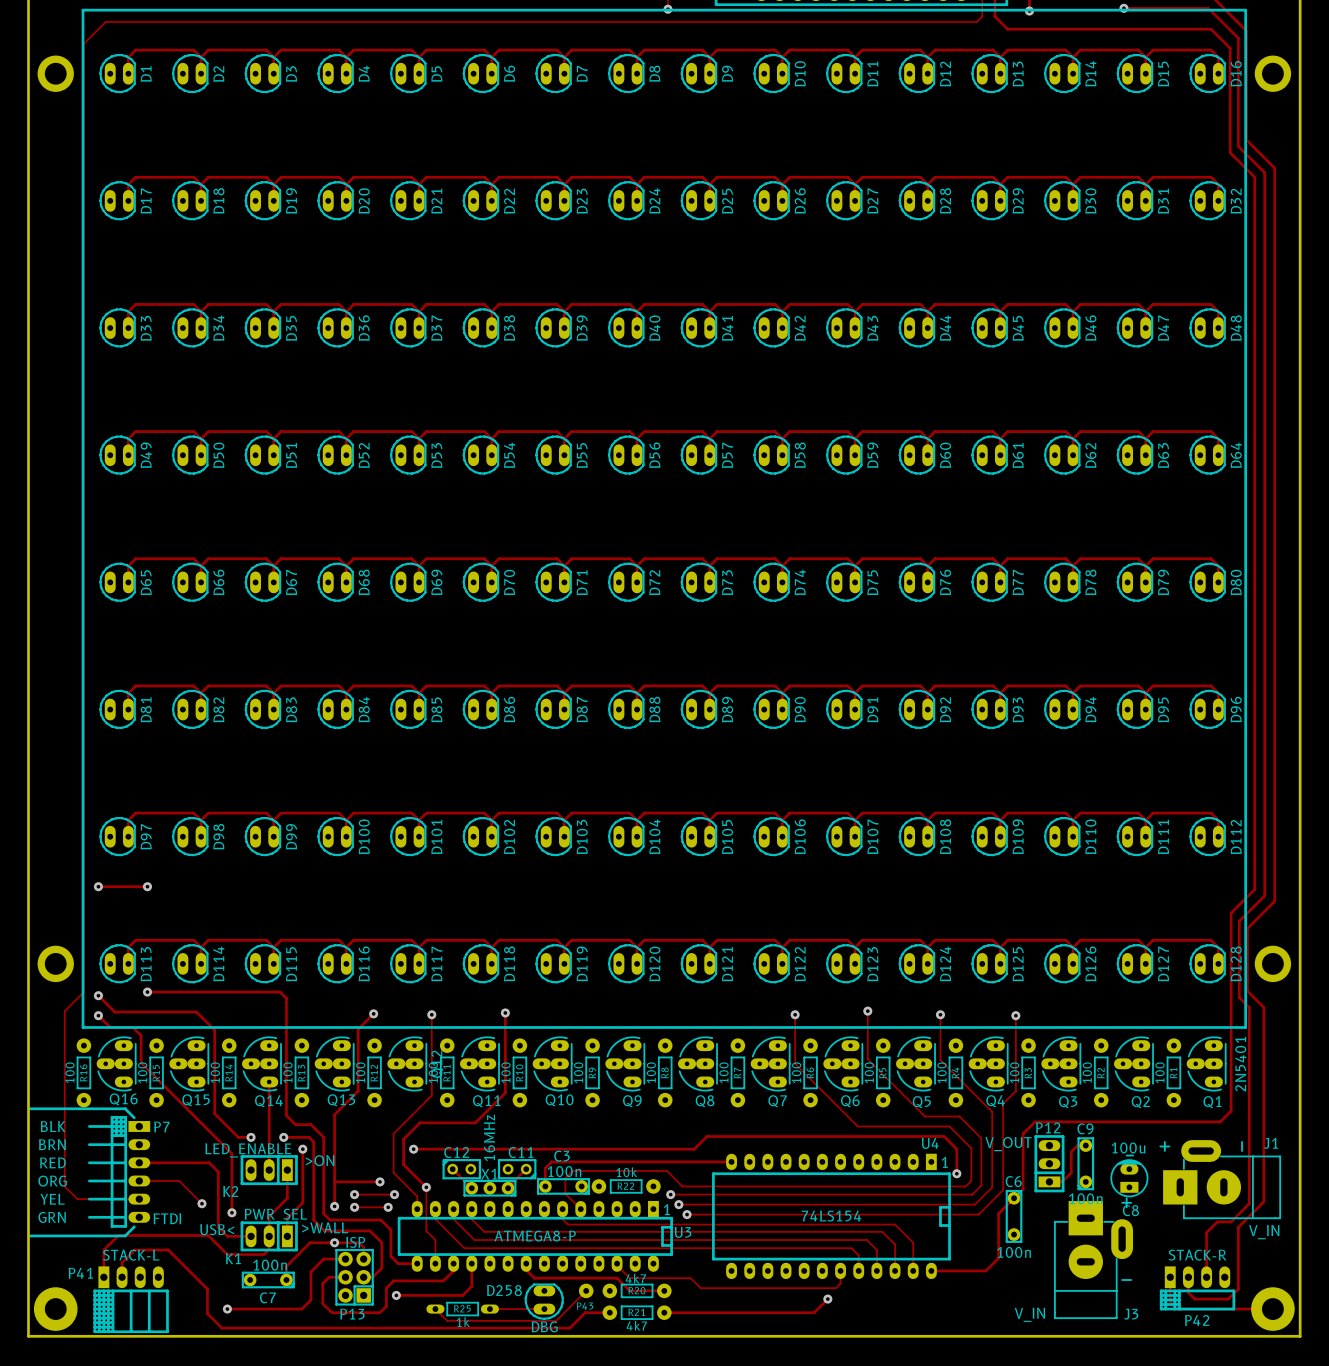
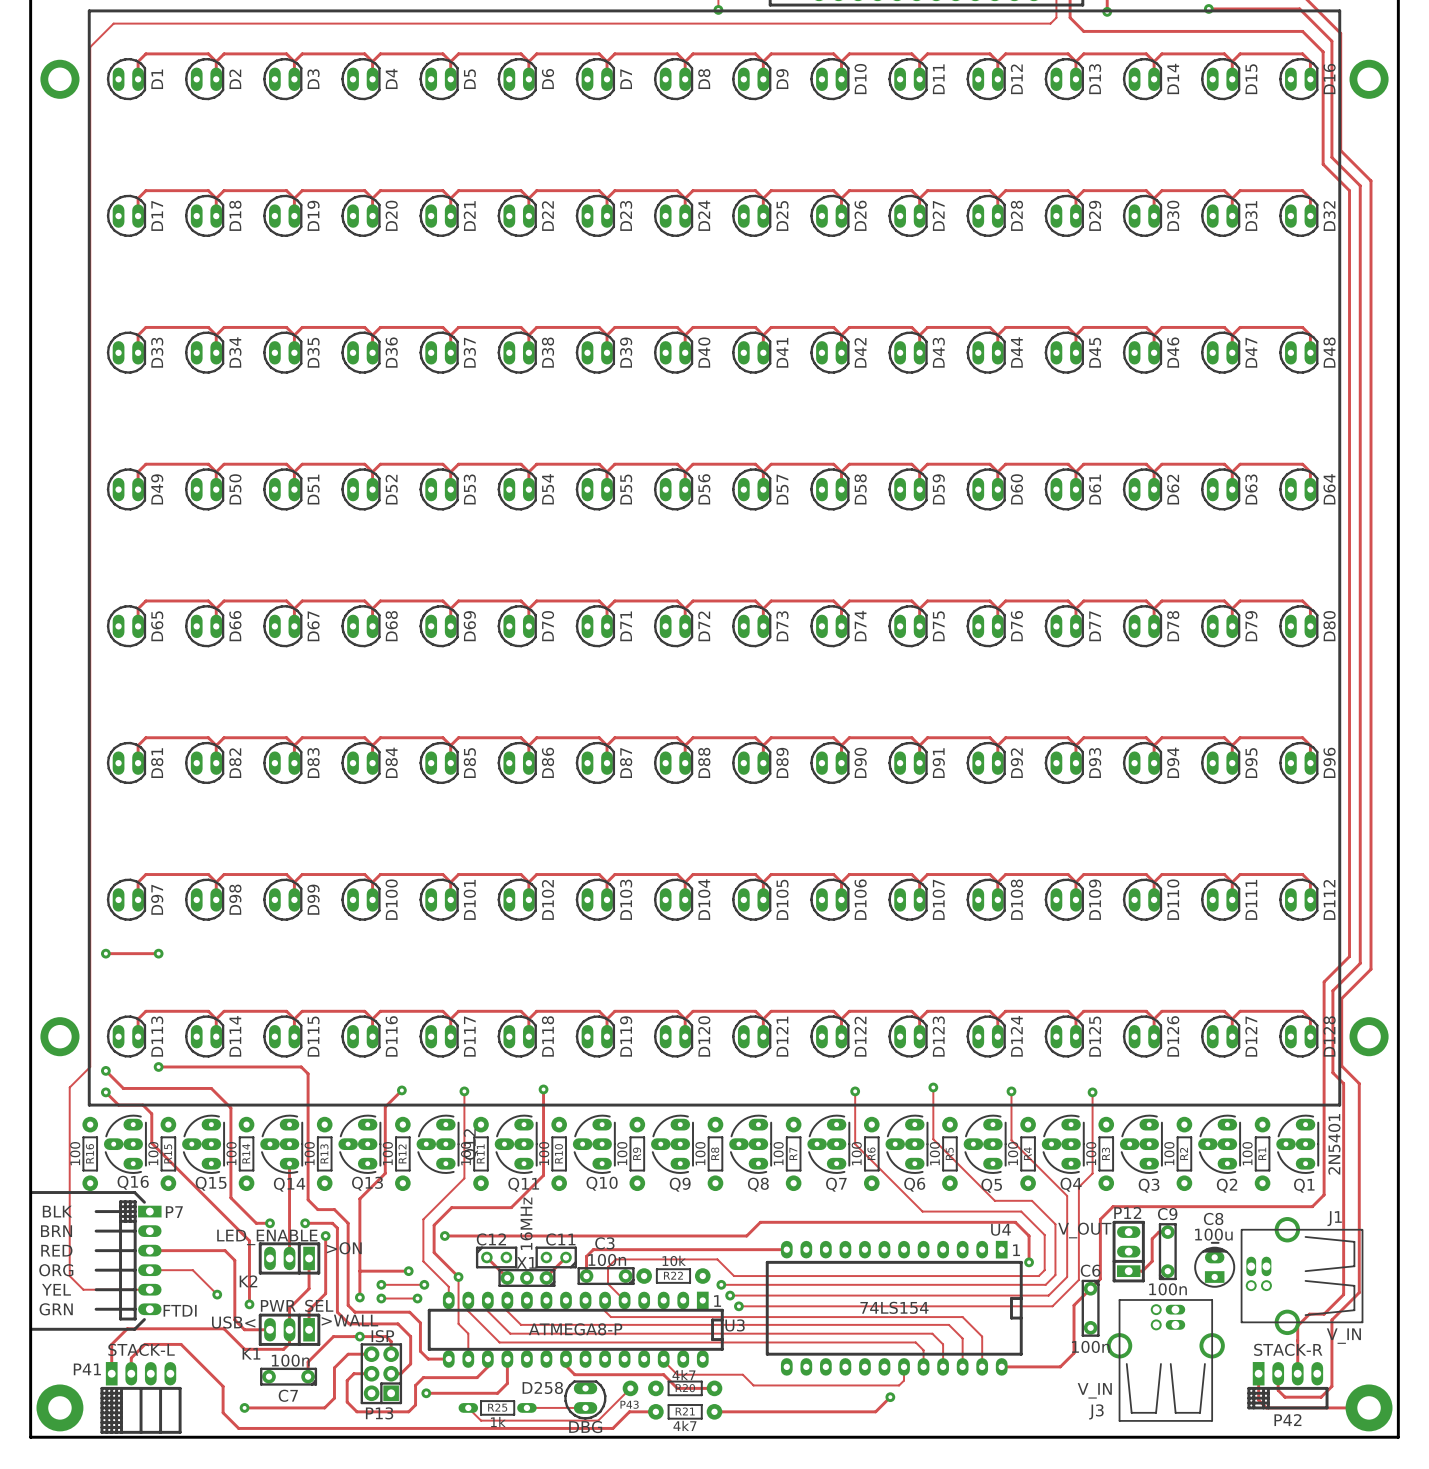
J1 footprint: [1159, 1140, 1282, 1220] -> [1241, 1217, 1363, 1336]
J1 name position: J1 (1271, 1143) -> J1 (1334, 1218)
J3 footprint: [1054, 1197, 1134, 1320] -> [1106, 1299, 1225, 1422]
C8 name position: C8 (1130, 1210) -> C8 (1213, 1218)
J3 value position: V_IN (1029, 1314) -> V_IN (1094, 1390)
J3 name position: J3 (1131, 1314) -> J3 (1096, 1411)

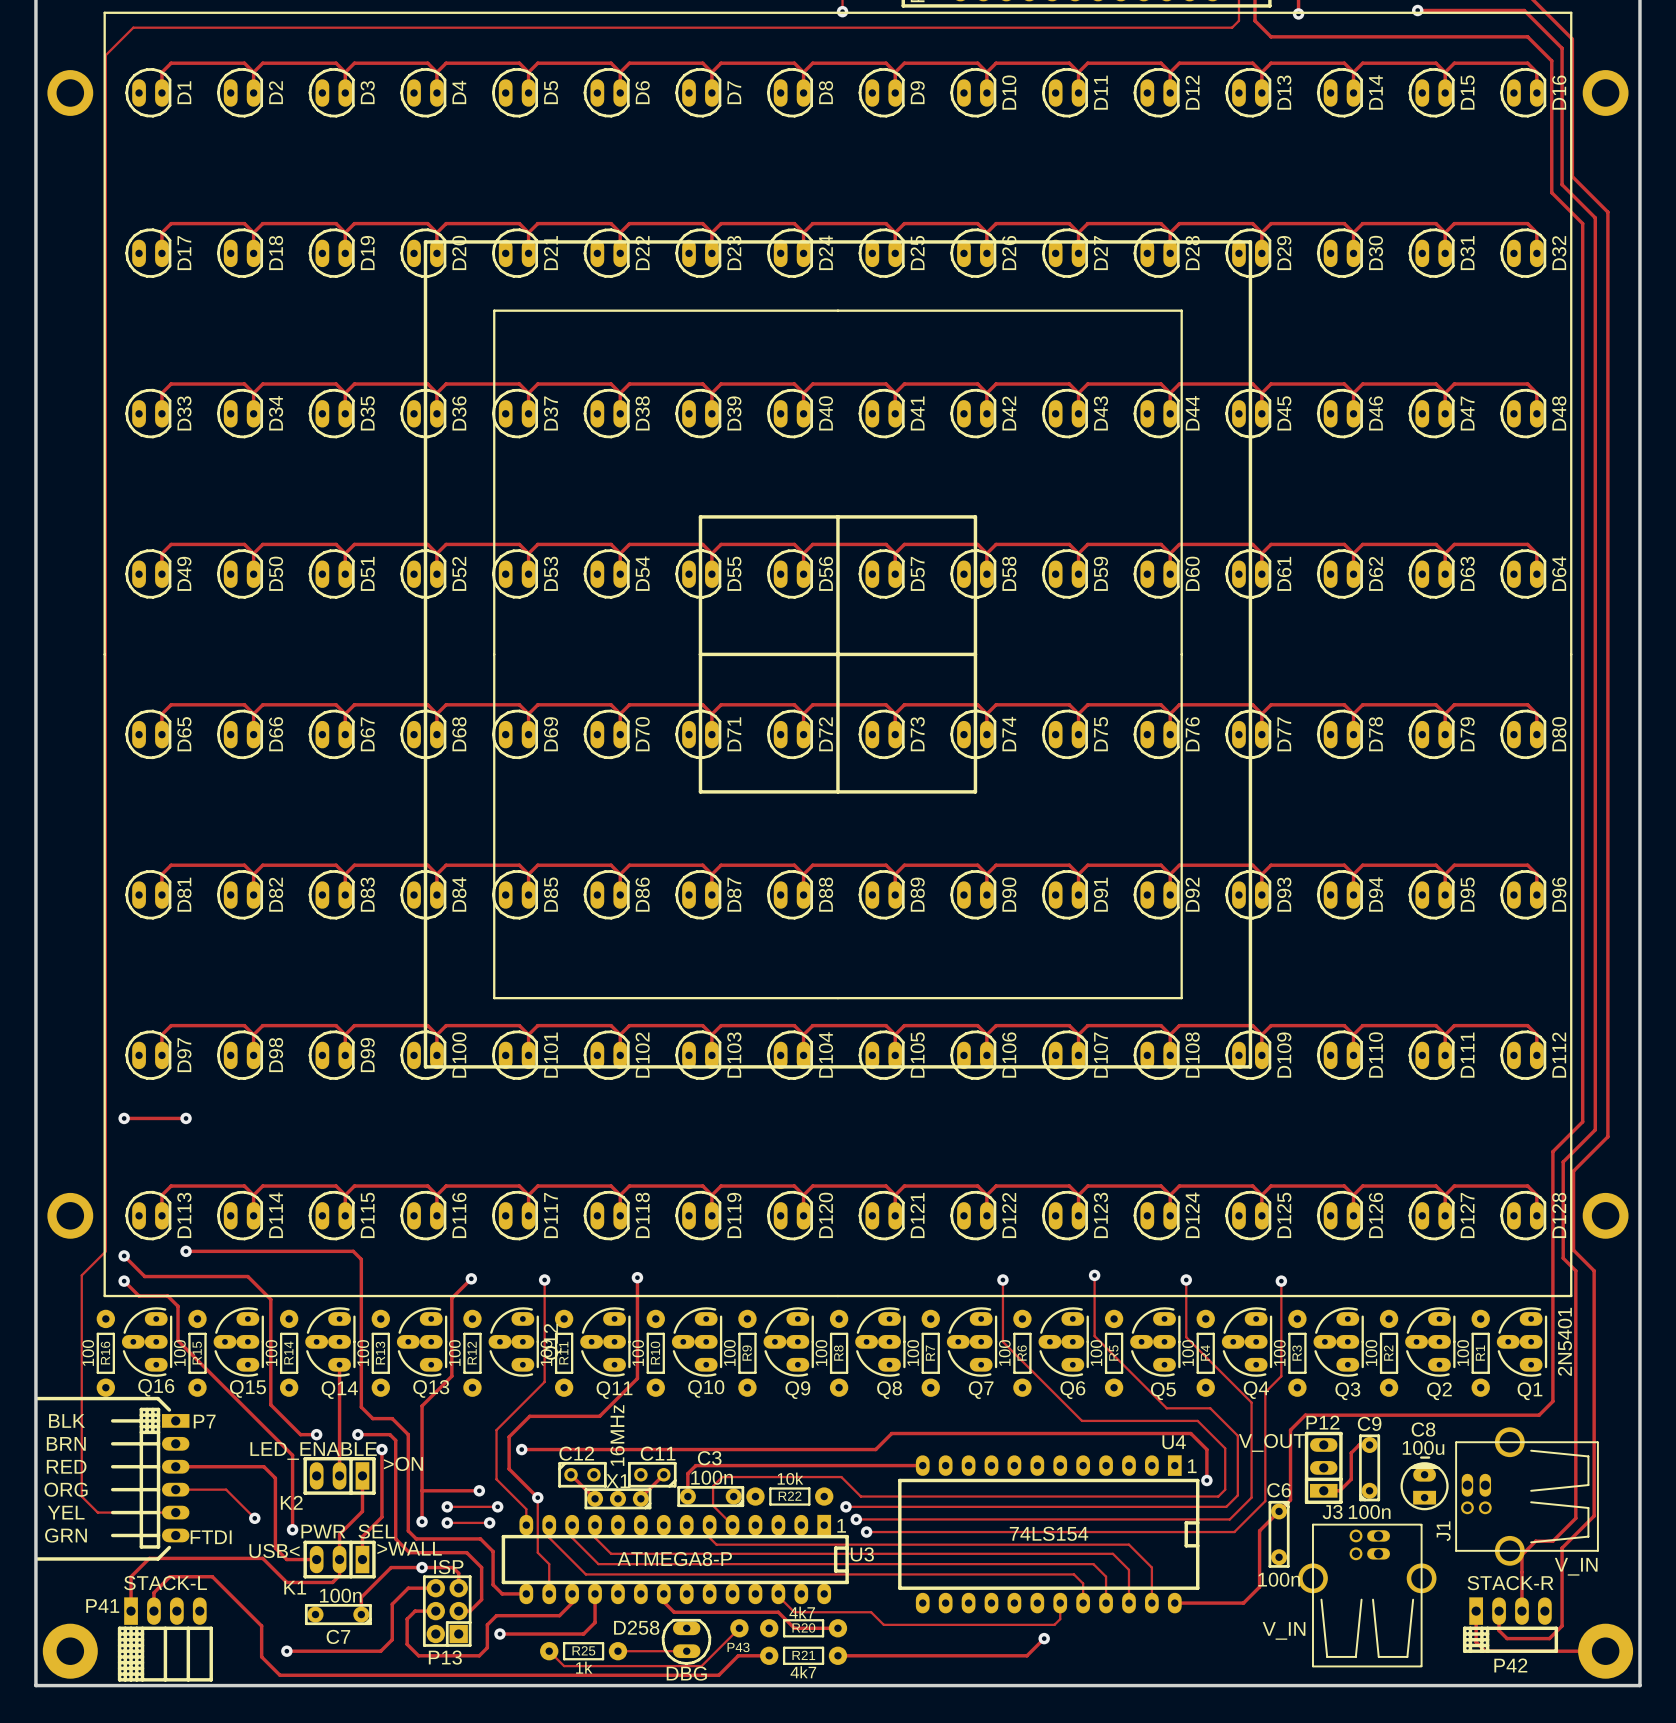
drawing: none -> [103, 11, 1573, 1298]
line: (89, 10) (89, 1105) (1339, 1105) (1339, 10) (89, 10) -> none
J1 name rotation: 0° (1334, 1218) -> 90° counterclockwise (1443, 1531)
J1 name position: J1 (1334, 1218) -> J1 (1443, 1531)
R25 footprint: [458, 1400, 537, 1416] -> [540, 1642, 628, 1661]
J3 name position: J3 (1096, 1411) -> J3 (1332, 1512)

